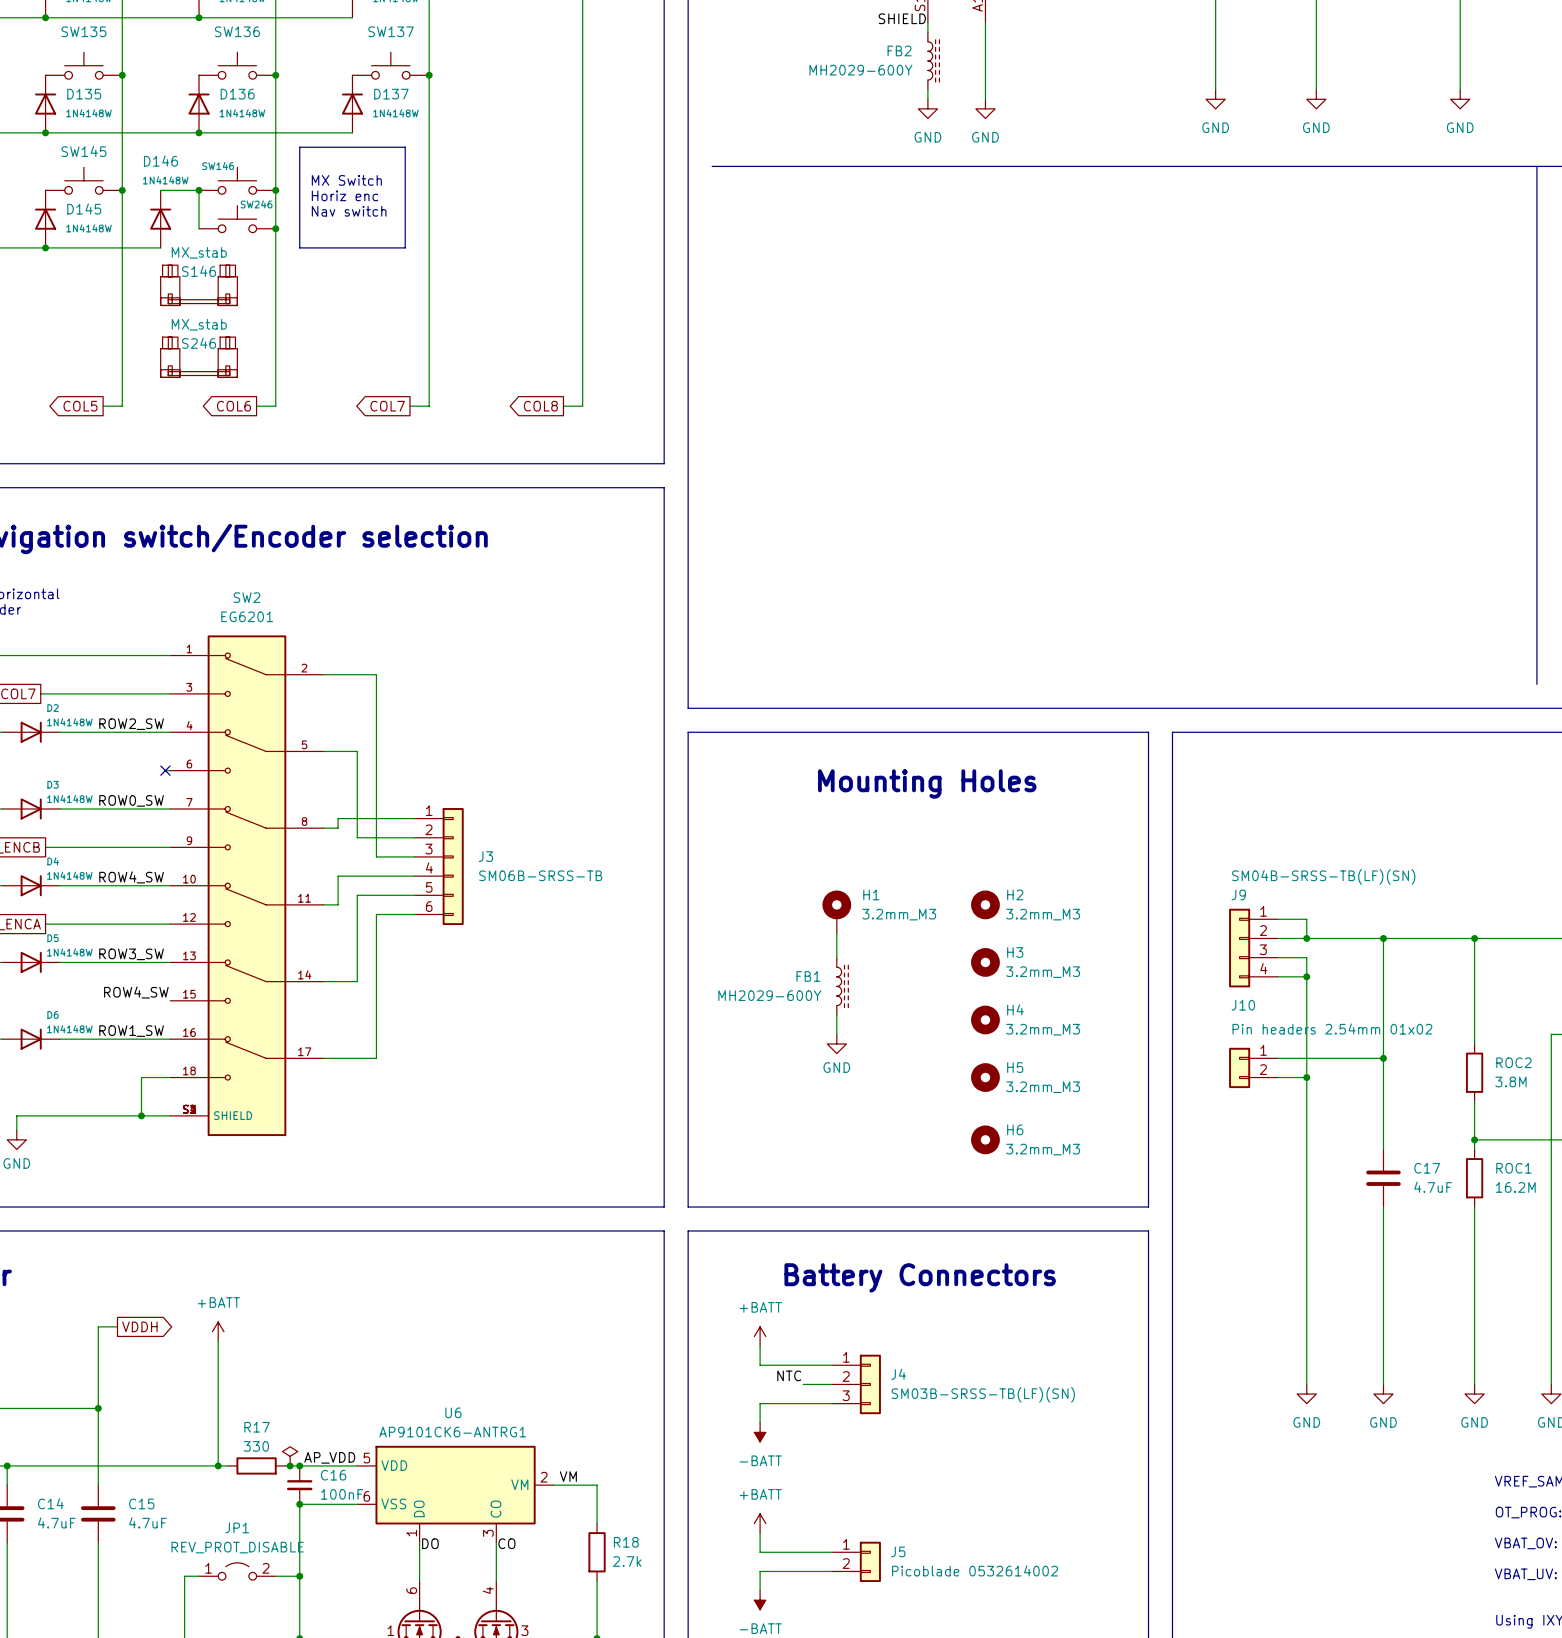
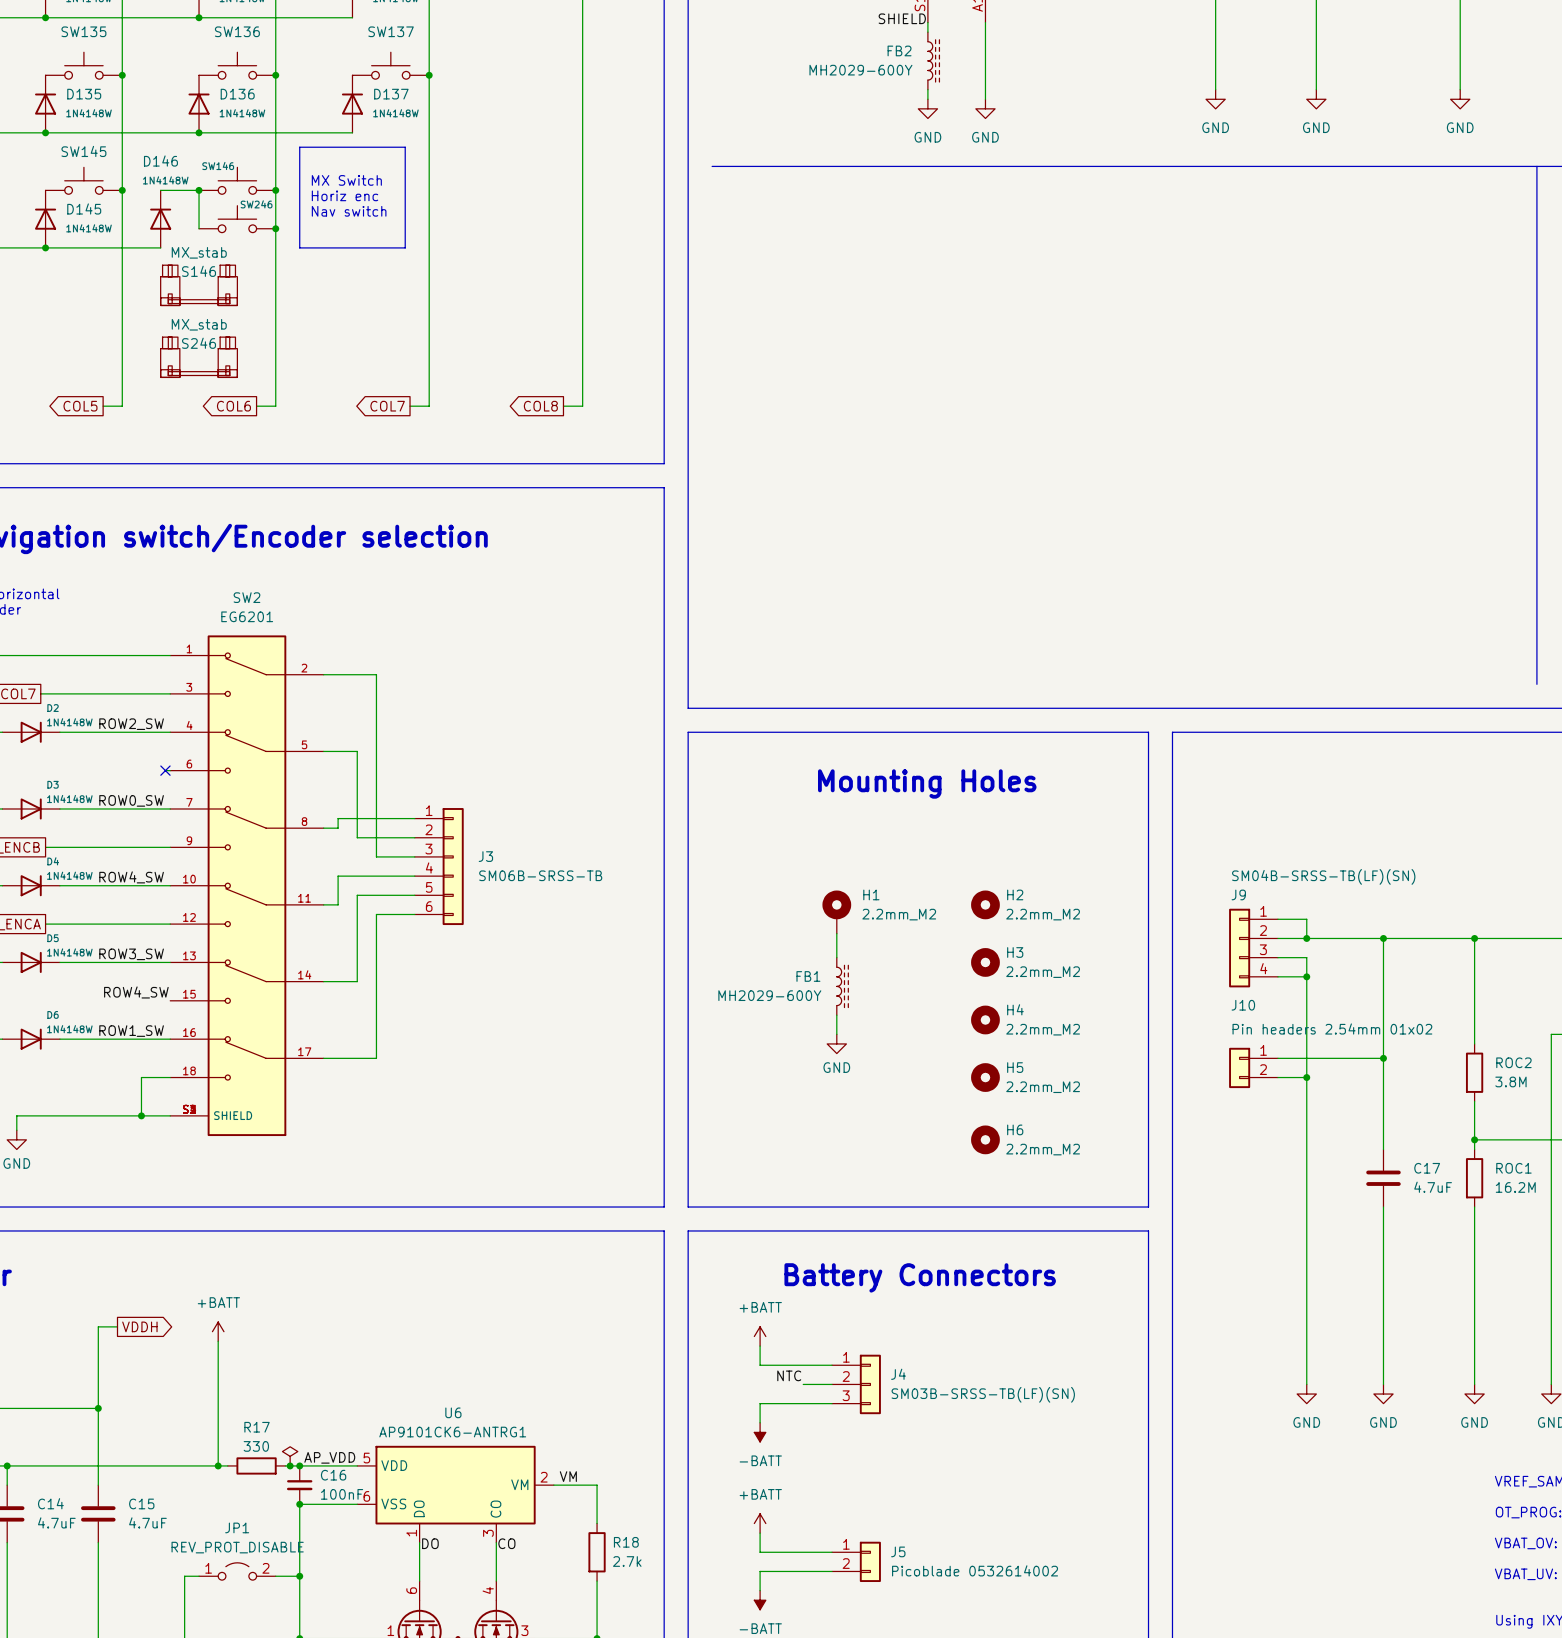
H1 value: 3.2mm_M3 (899, 914) -> 2.2mm_M2 (899, 914)
H2 value: 3.2mm_M3 (1043, 914) -> 2.2mm_M2 (1043, 914)
H3 value: 3.2mm_M3 (1043, 972) -> 2.2mm_M2 (1043, 972)
H4 value: 3.2mm_M3 (1043, 1029) -> 2.2mm_M2 (1043, 1029)
H5 value: 3.2mm_M3 (1043, 1087) -> 2.2mm_M2 (1043, 1087)
H6 value: 3.2mm_M3 (1043, 1149) -> 2.2mm_M2 (1043, 1149)

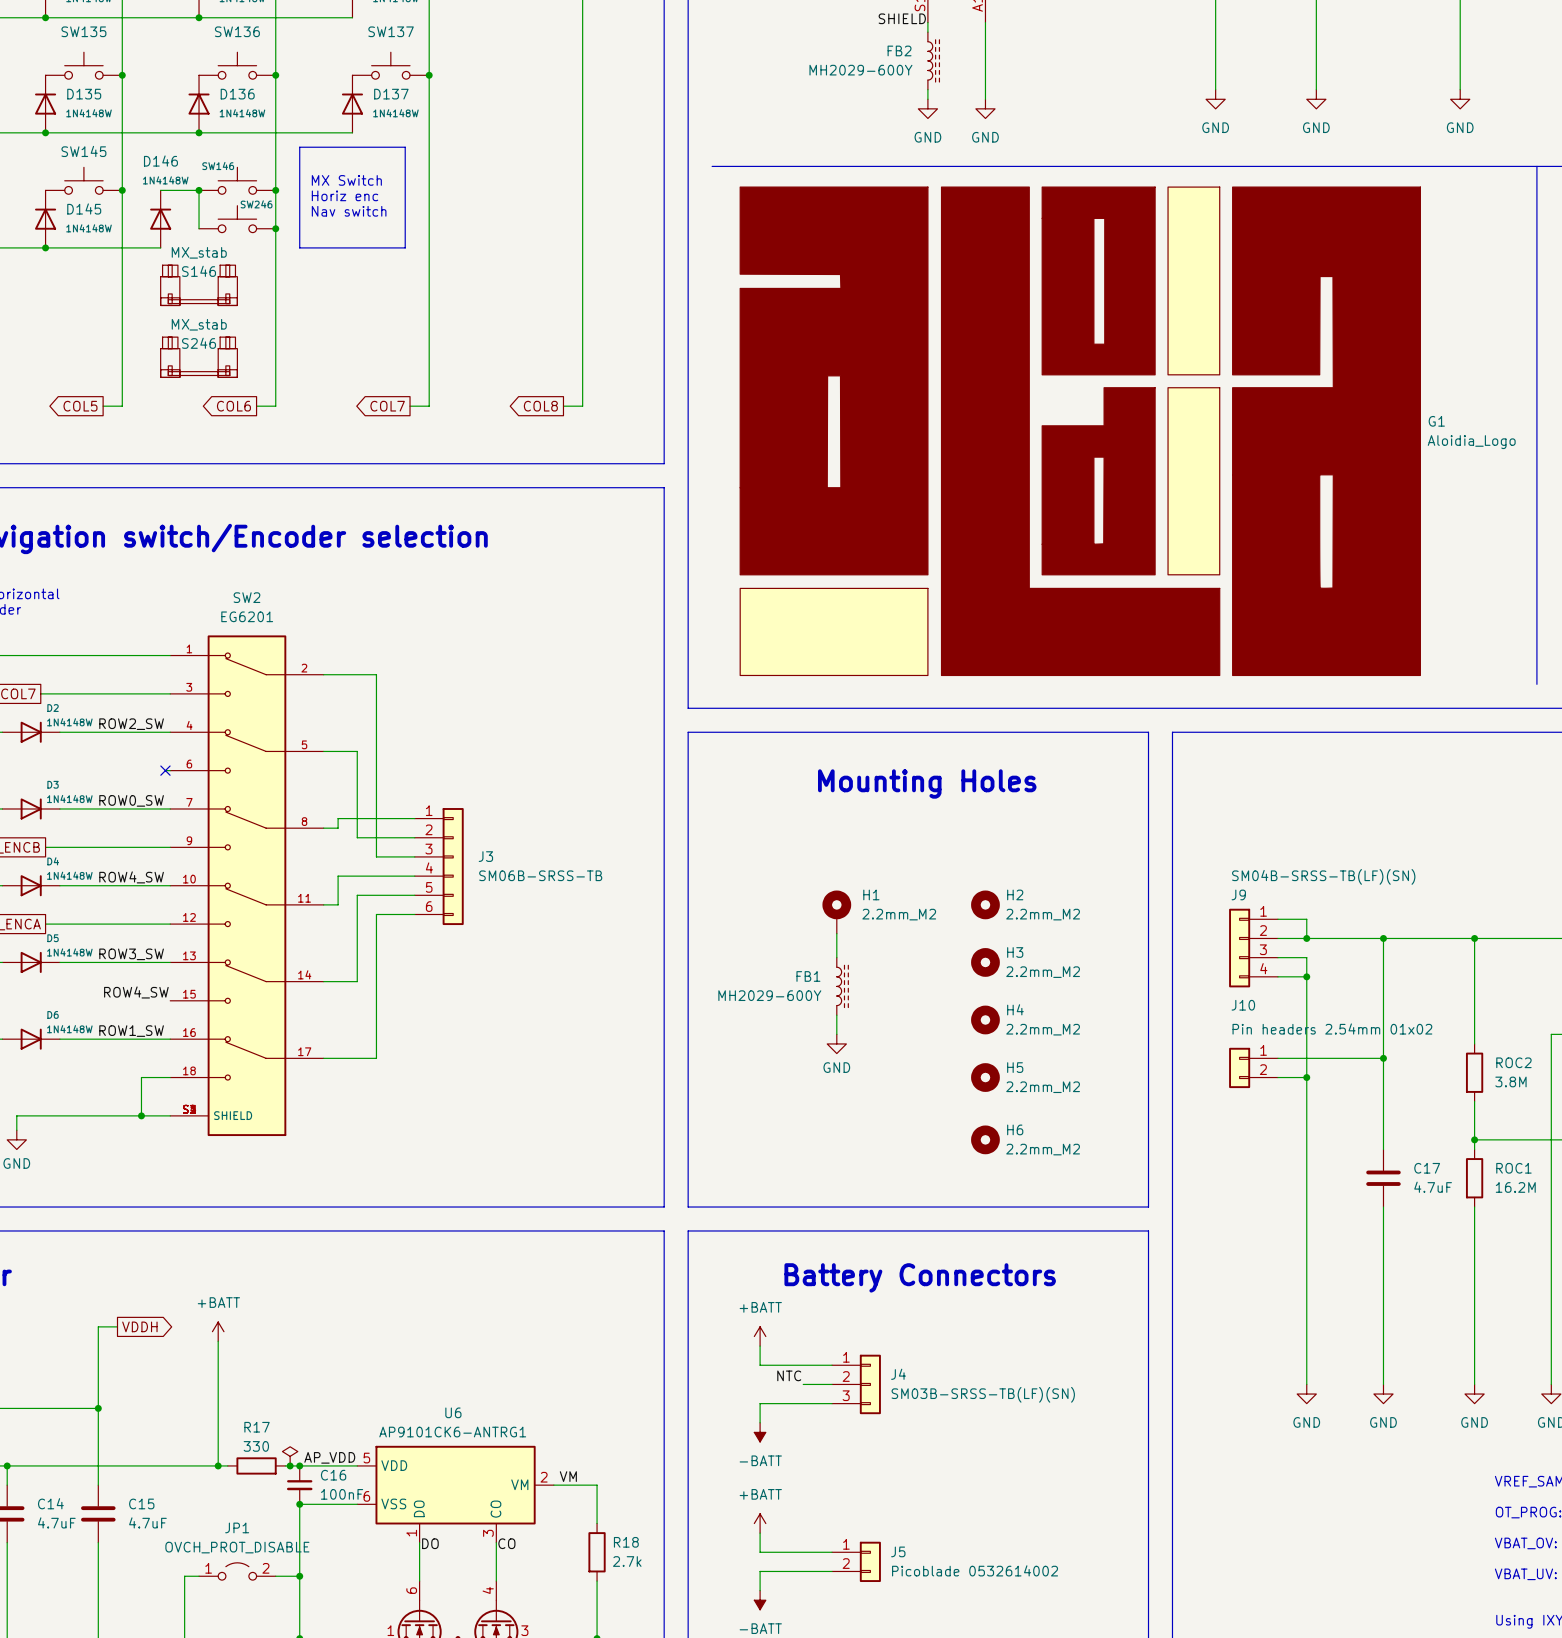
G1: none -> Aloidia_Logo (1080, 431)
JP1 value: REV_PROT_DISABLE (237, 1547) -> OVCH_PROT_DISABLE (237, 1547)

